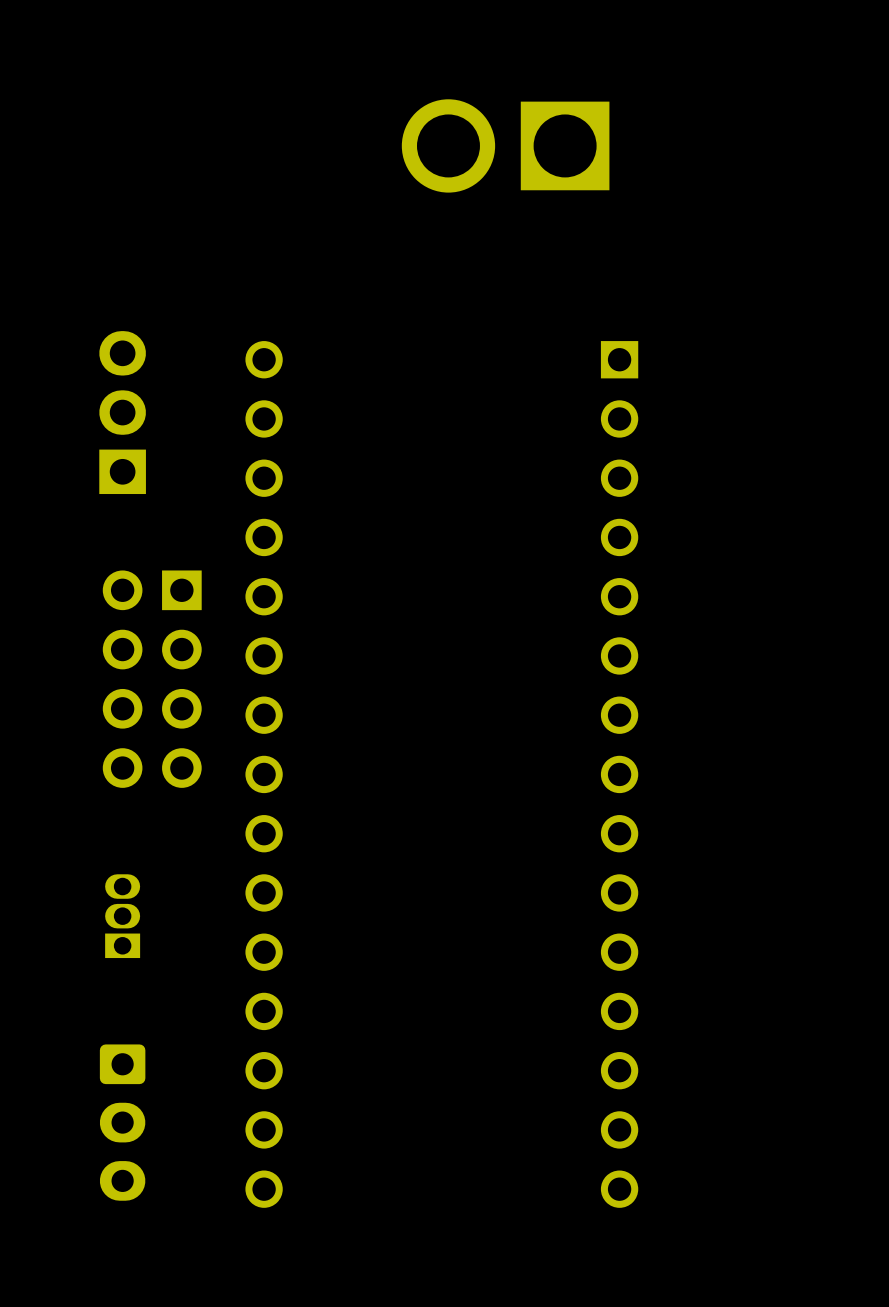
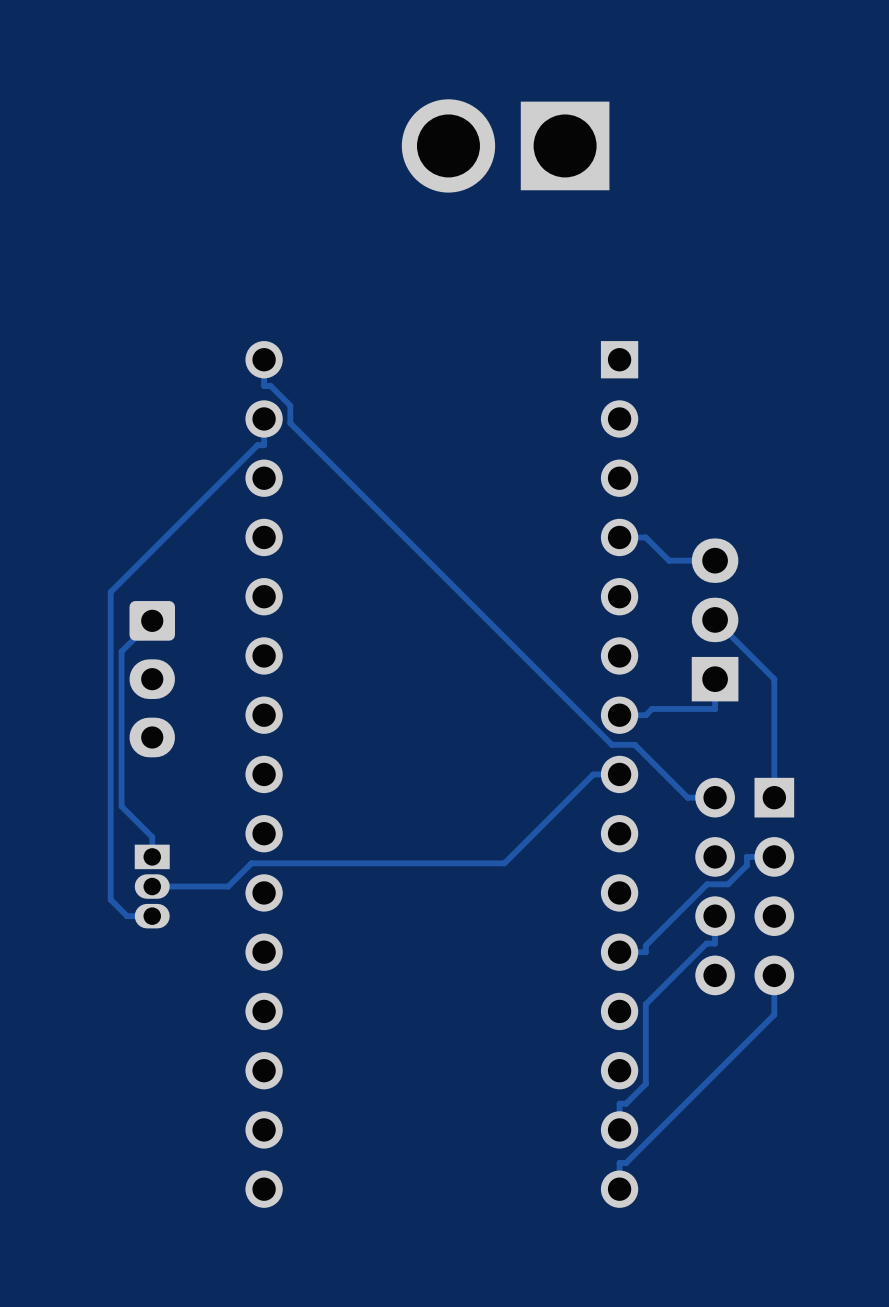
track: none -> (264, 359) (264, 385) (270, 385) (290, 405) (290, 423) (611, 744) (634, 744) (687, 797) (715, 797)
part: (122, 412) -> none
track: none -> (264, 418) (264, 445) (257, 445) (110, 592) (110, 899) (127, 916) (152, 916)
track: none -> (619, 537) (645, 537) (669, 560) (715, 560)
part footprint: [102, 570, 202, 788] -> [129, 601, 175, 758]
track: none -> (715, 619) (774, 679) (774, 797)
part: none -> (715, 619)
track: none -> (152, 620) (121, 651) (121, 806) (152, 837) (152, 856)
track: none -> (715, 679) (715, 708) (652, 708) (645, 715) (619, 715)
track: none -> (619, 774) (593, 774) (504, 863) (251, 863) (228, 886) (152, 886)
track: none -> (774, 856) (746, 856) (746, 865) (728, 884) (707, 884) (645, 945) (645, 952) (619, 952)
part: none -> (744, 886)
part rotation: 0° (122, 916) -> 180° (152, 886)
track: none -> (715, 916) (715, 943) (706, 943) (645, 1004) (645, 1084) (626, 1103) (619, 1103) (619, 1129)
track: none -> (774, 975) (774, 1014) (626, 1162) (619, 1162) (619, 1189)
part: (122, 1122) -> none

